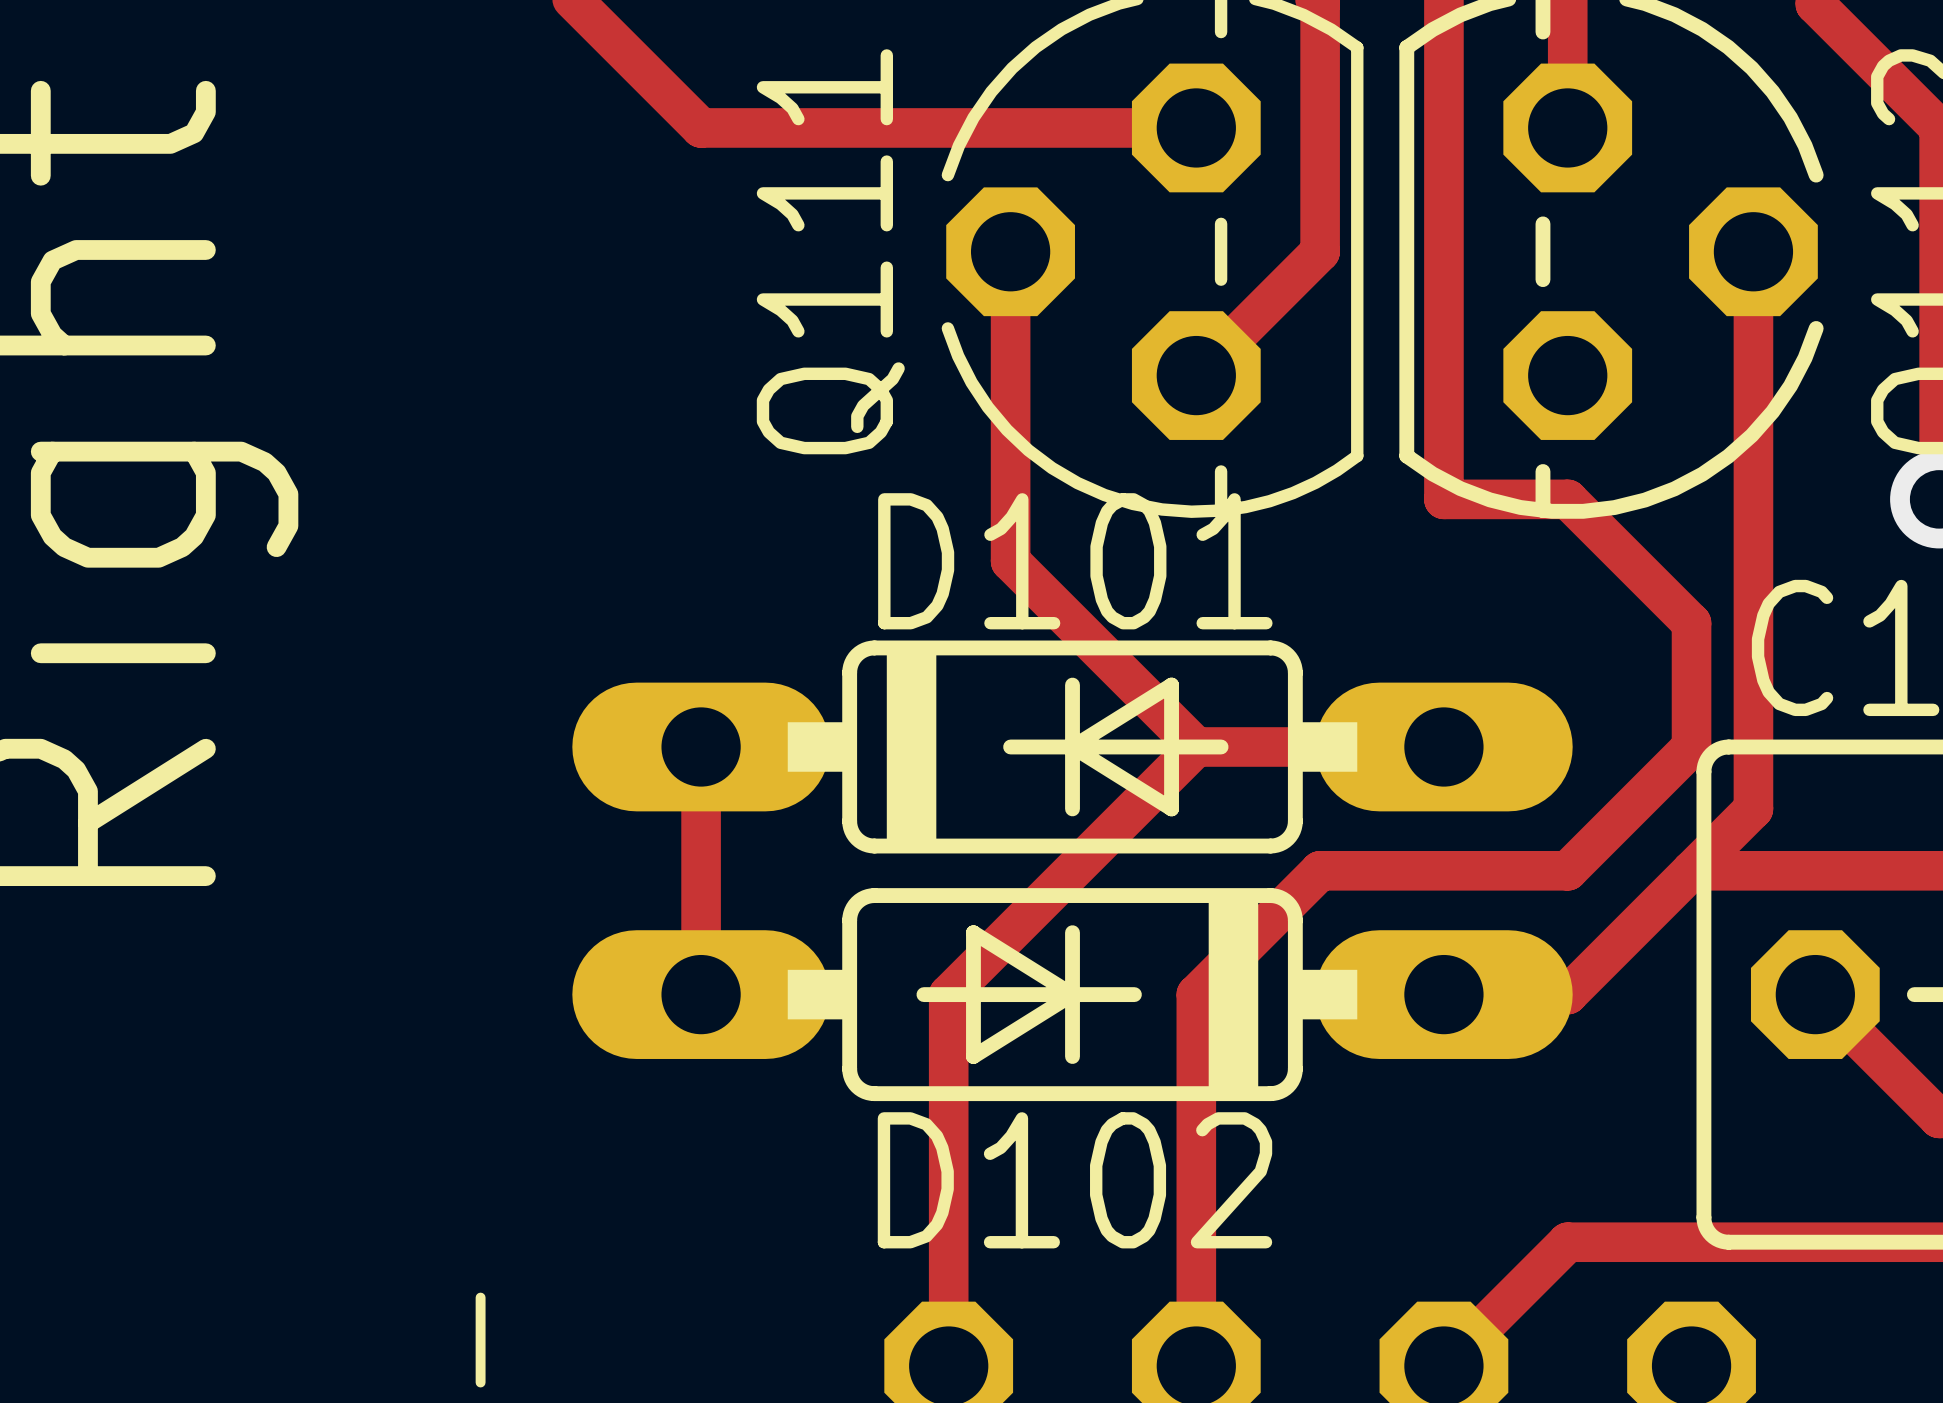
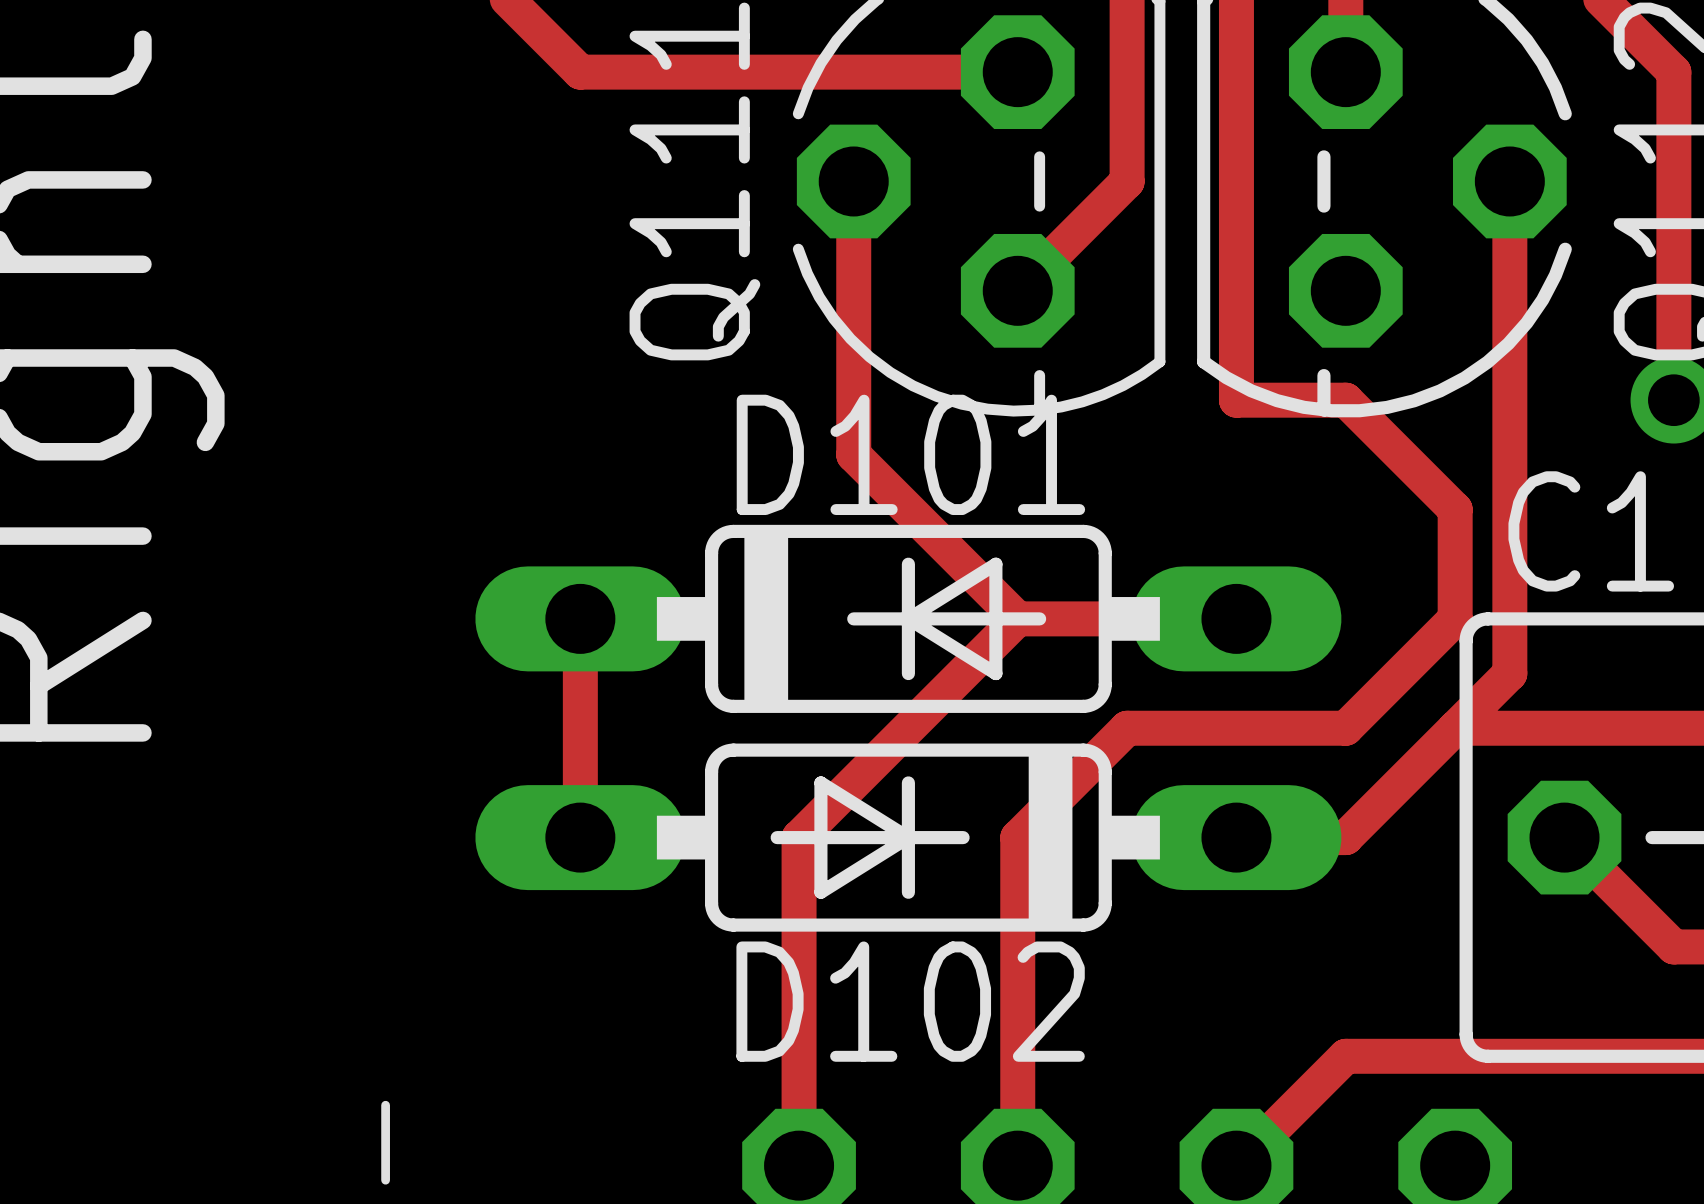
D101 footprint: [572, 640, 1573, 854] -> [475, 524, 1342, 713]
D102 footprint: [572, 888, 1573, 1102] -> [475, 743, 1342, 932]

